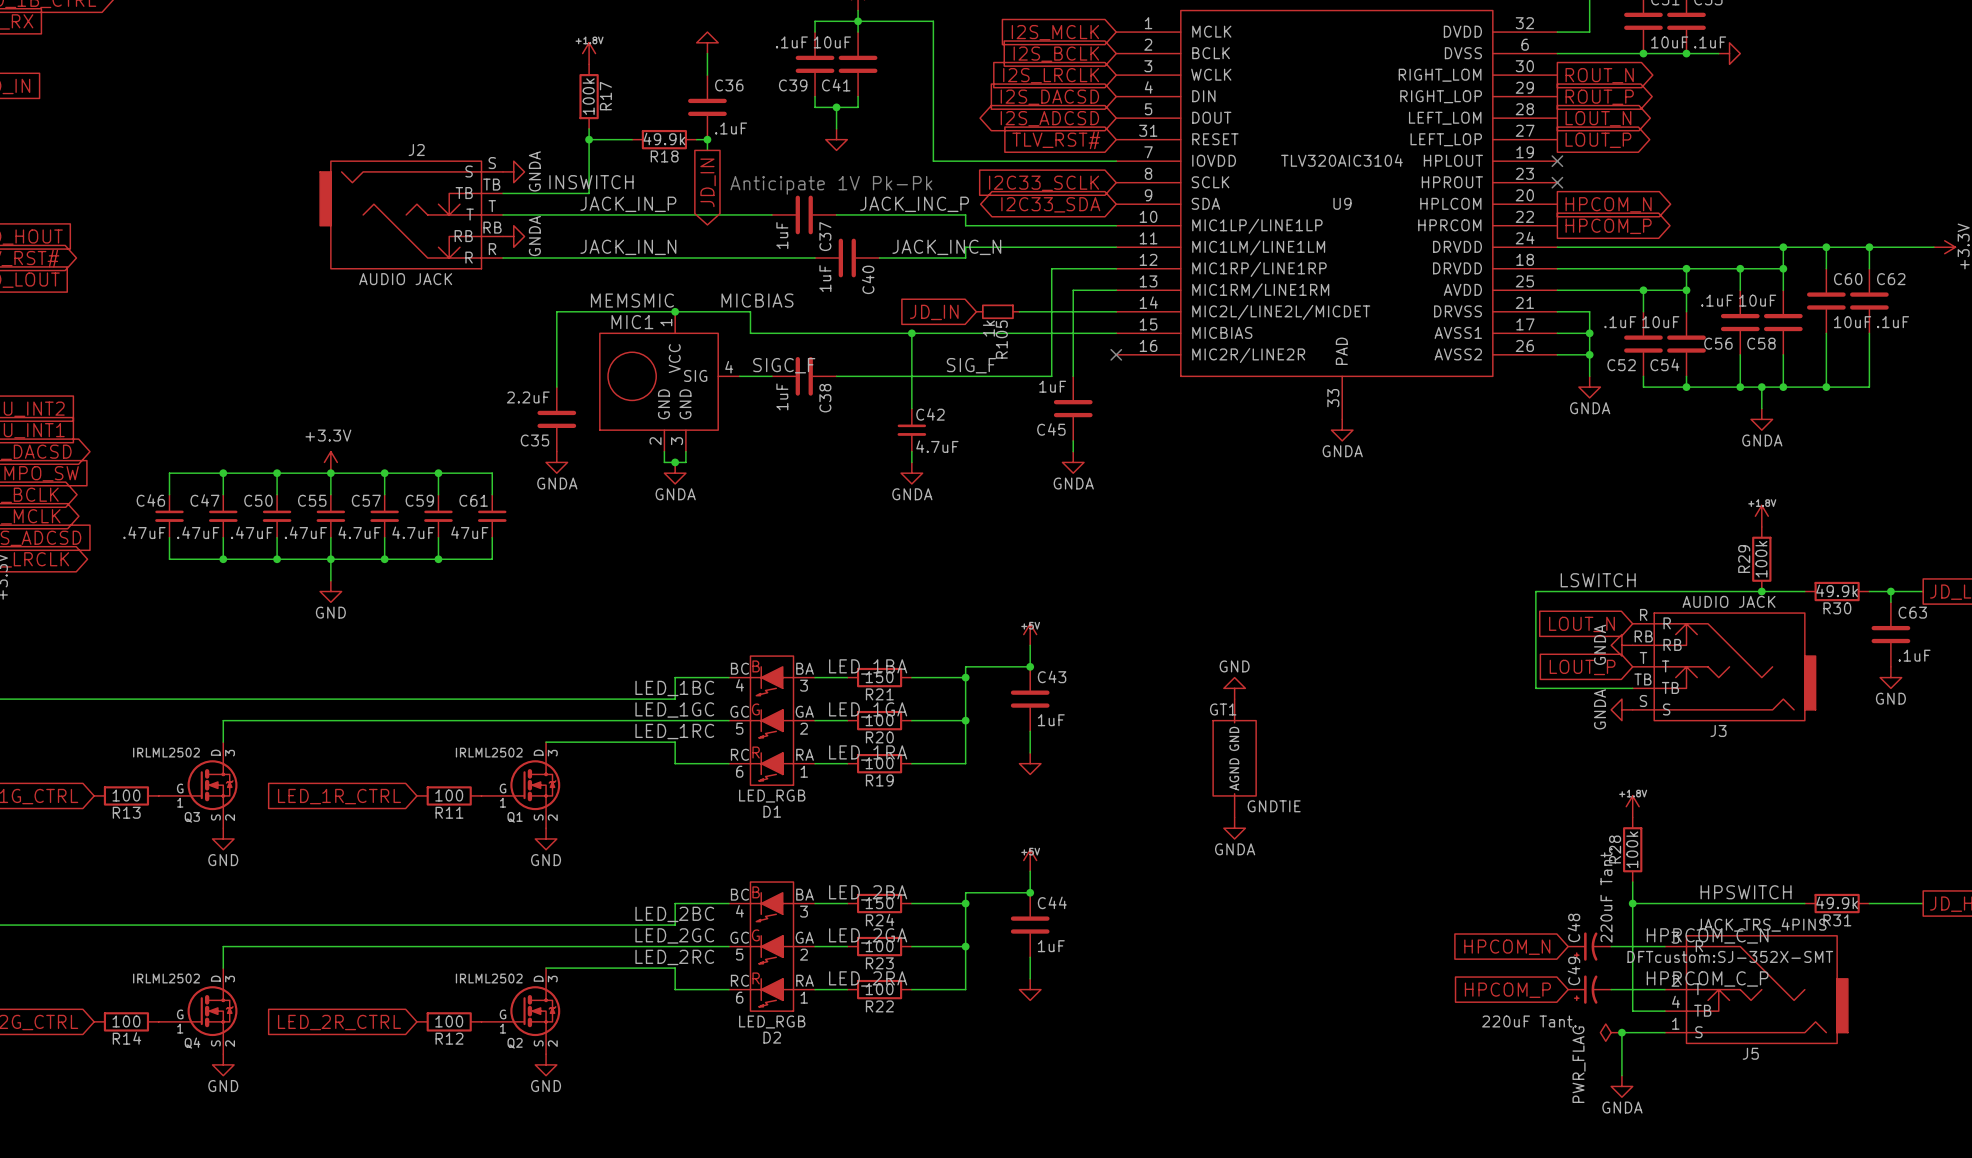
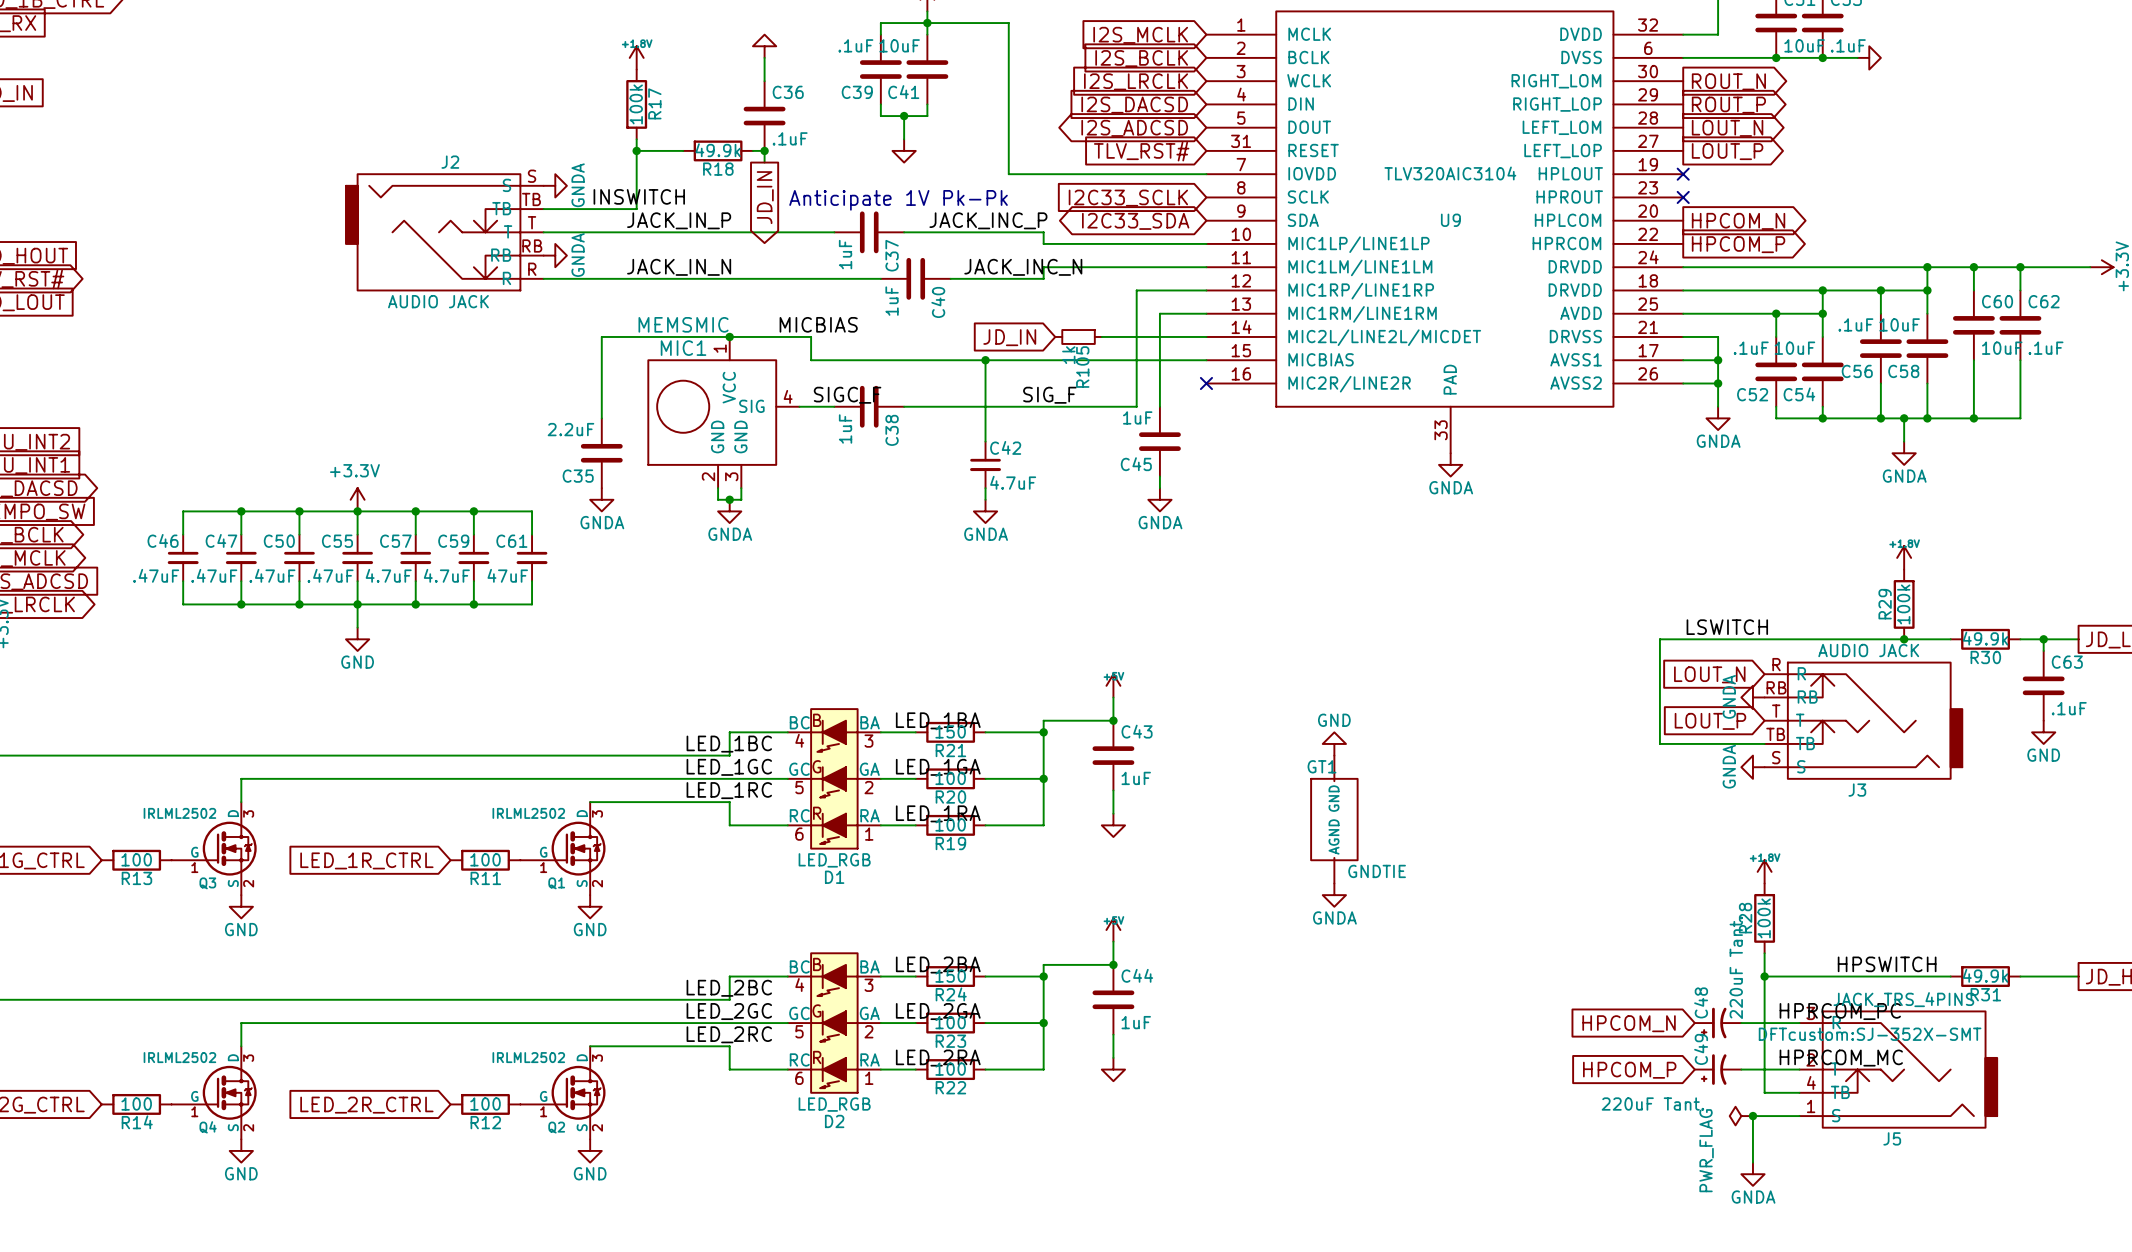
label: HPRCOM_C_N (1707, 935) -> HPRCOM_PC (1840, 1011)
label: HPRCOM_C_P (1707, 978) -> HPRCOM_MC (1841, 1058)

